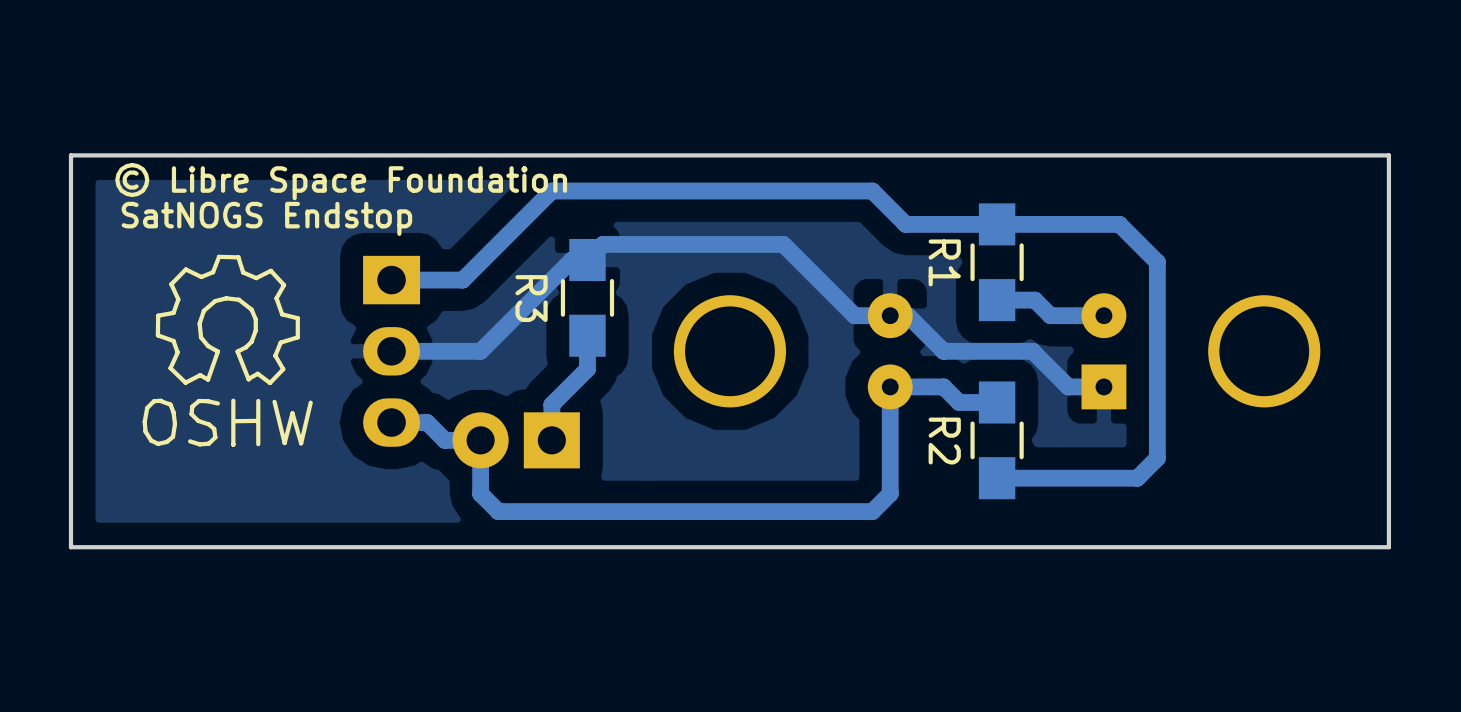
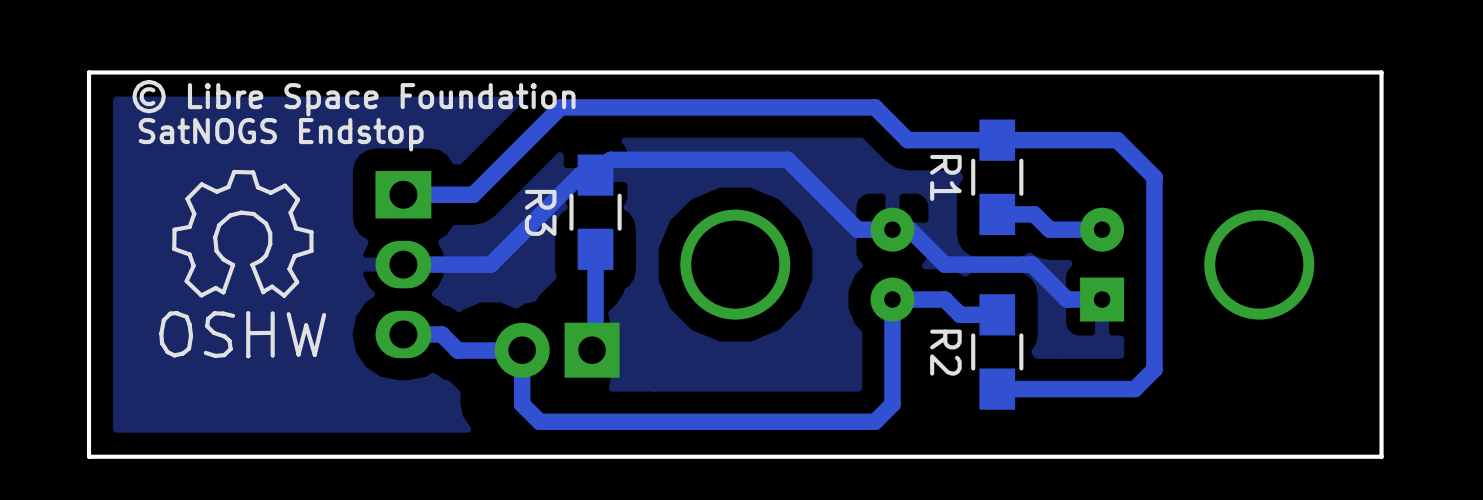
bottom track: (587, 369) (551, 404) (551, 440) -> (595, 282) (595, 346) (592, 350)
bottom track: (427, 422) (444, 440) (480, 440) (480, 493) (498, 511) (530, 511) -> (438, 334) (441, 334) (457, 350) (521, 350)
bottom track: none -> (522, 350) (522, 404) (539, 421)
part position: (516, 440) -> (557, 350)

